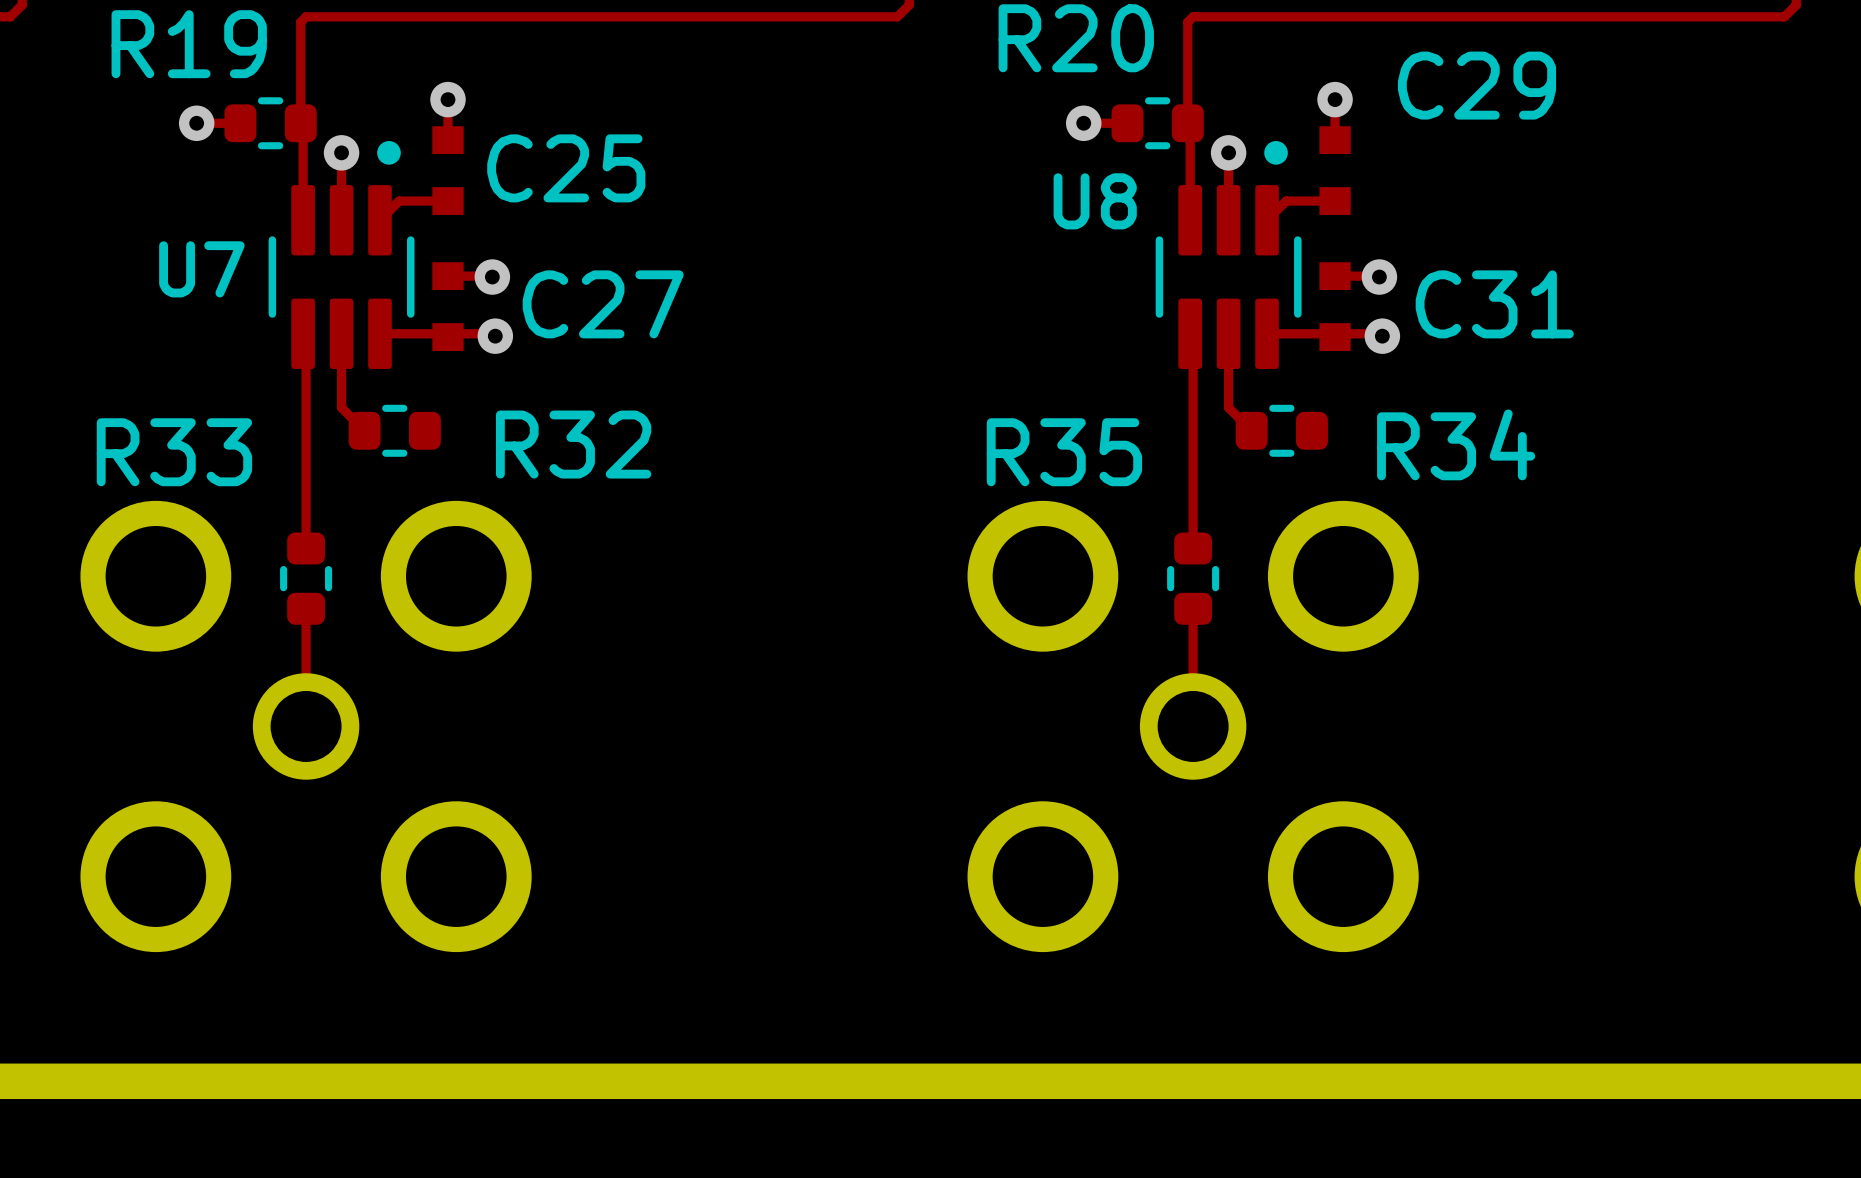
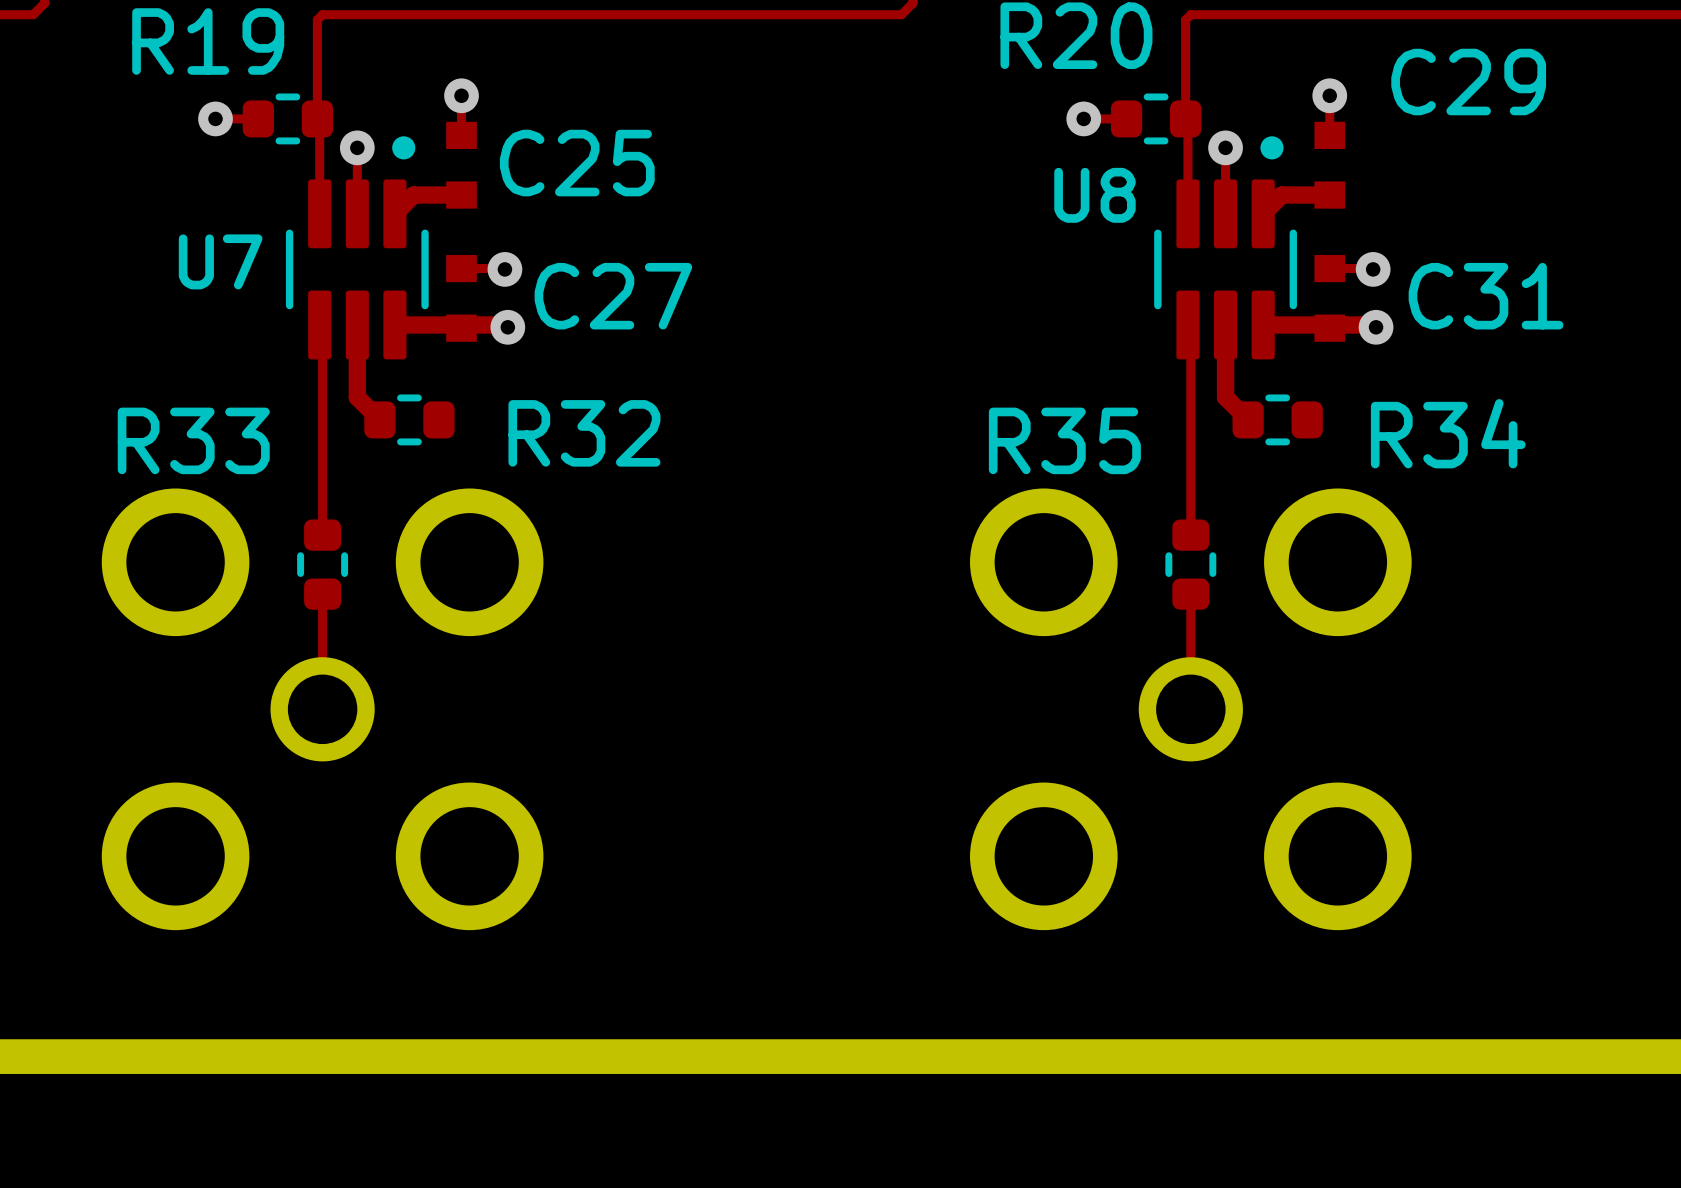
top track width: thin (448, 201) (399, 201) (379, 220) -> thick (461, 195) (413, 195) (394, 213)
top track width: thin (1335, 201) (1286, 201) (1267, 220) -> thick (1329, 195) (1282, 195) (1263, 213)
top track width: thin (341, 333) (341, 407) (364, 430) -> thick (357, 324) (357, 397) (379, 419)
top track width: thin (379, 333) (492, 333) -> thick (394, 324) (505, 324)
top track width: thin (1228, 333) (1228, 407) (1251, 430) -> thick (1225, 324) (1225, 397) (1248, 419)
top track width: thin (1267, 333) (1380, 333) -> thick (1263, 324) (1373, 324)

